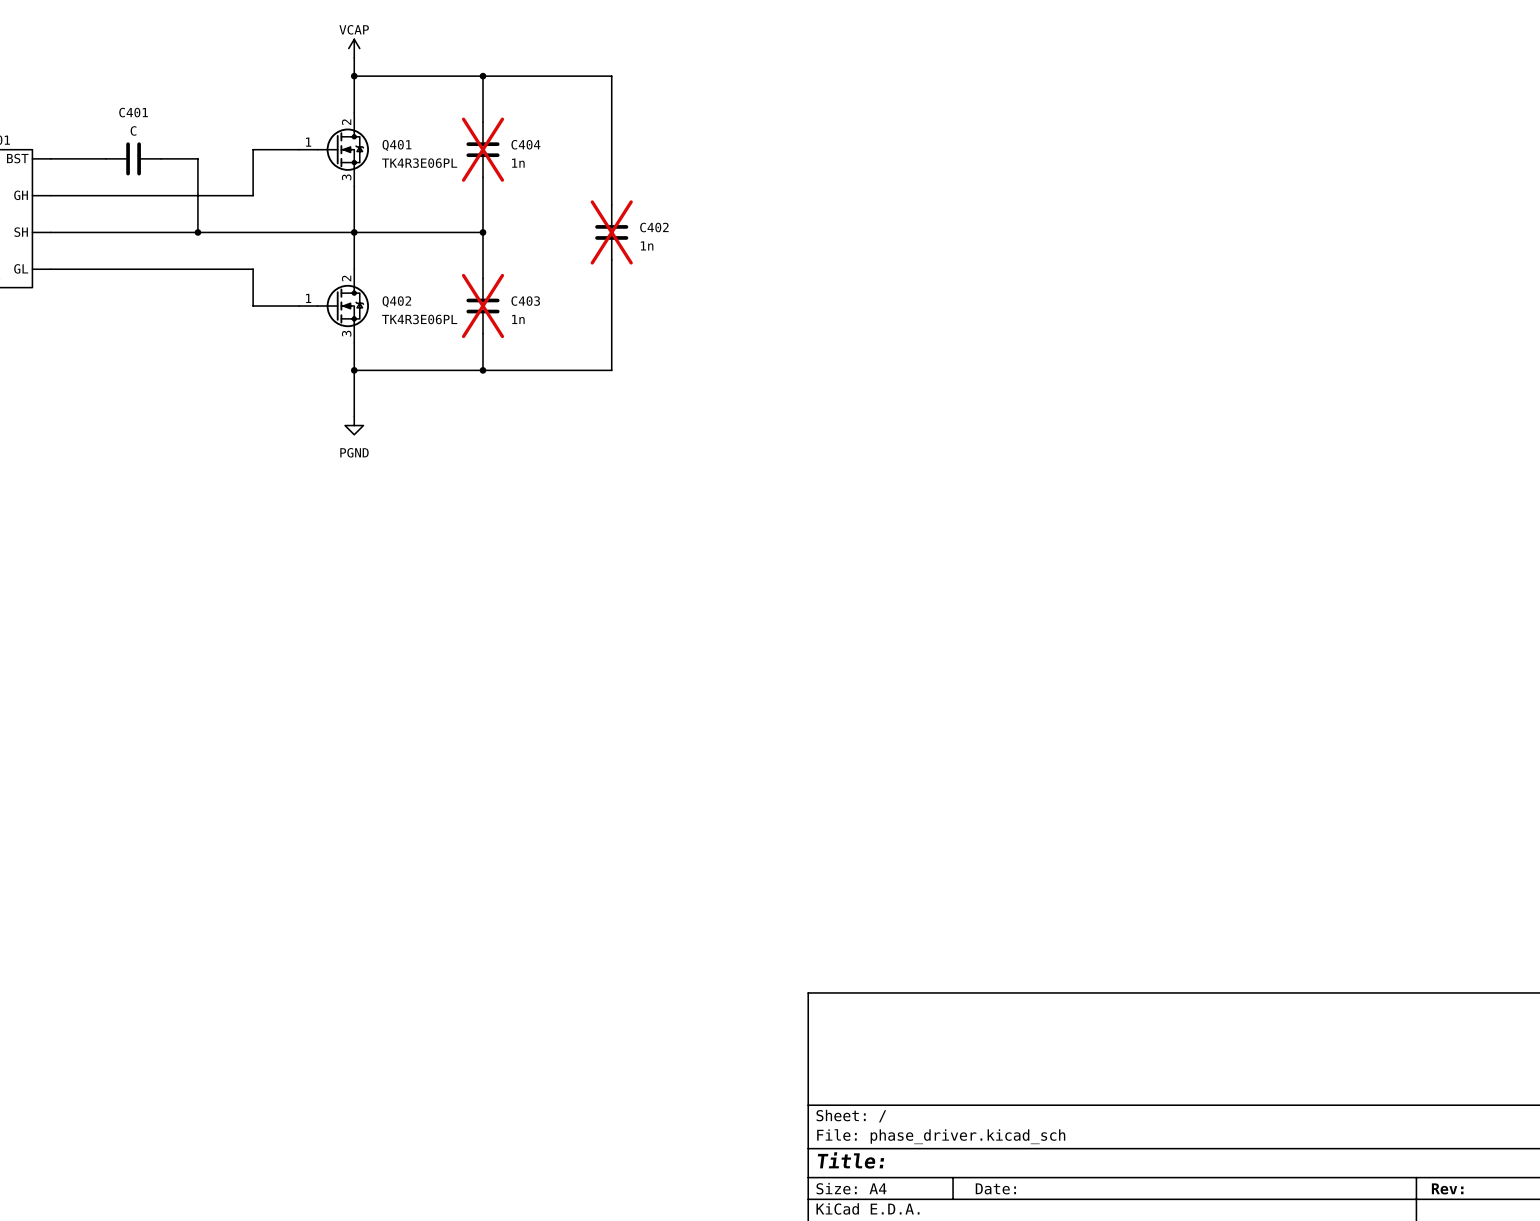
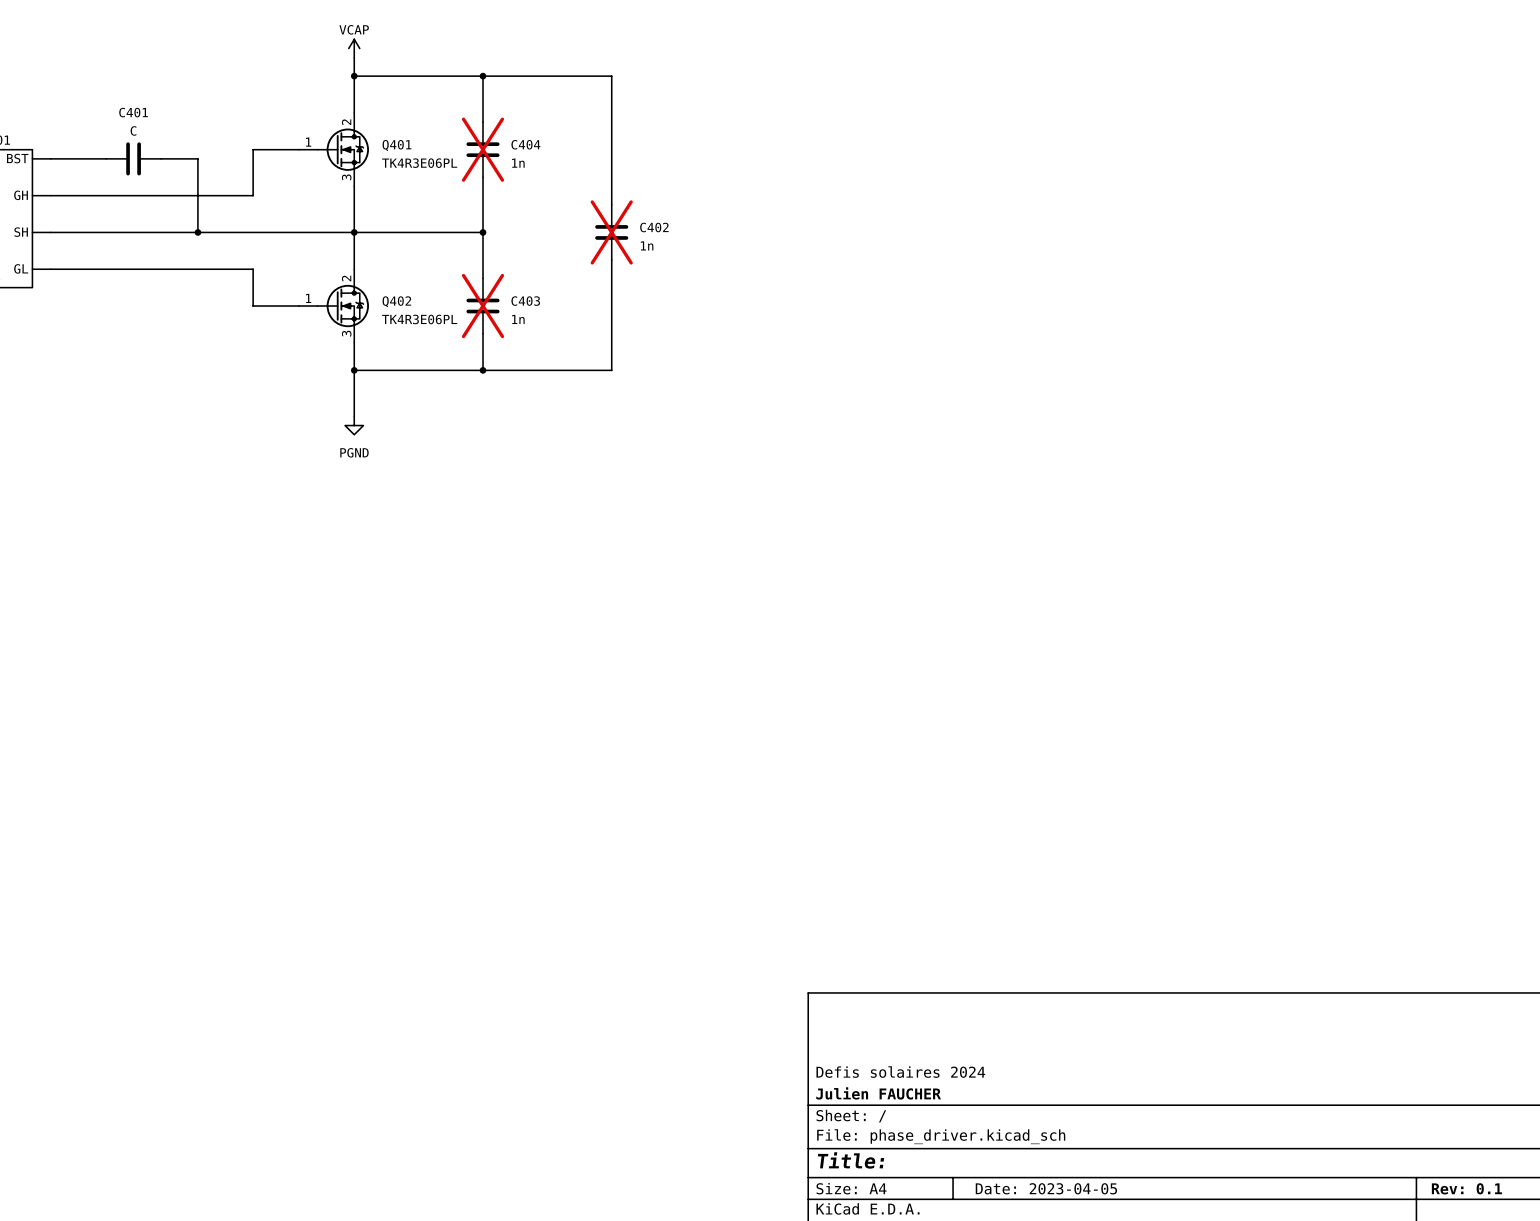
title block: none -> Defis solaires 2024 (900, 1072)
title block: none -> Julien FAUCHER (878, 1093)
title block: Date: (995, 1188) -> Date: 2023-04-05 (1046, 1188)
title block: Rev: (1447, 1188) -> Rev: 0.1 (1466, 1188)

